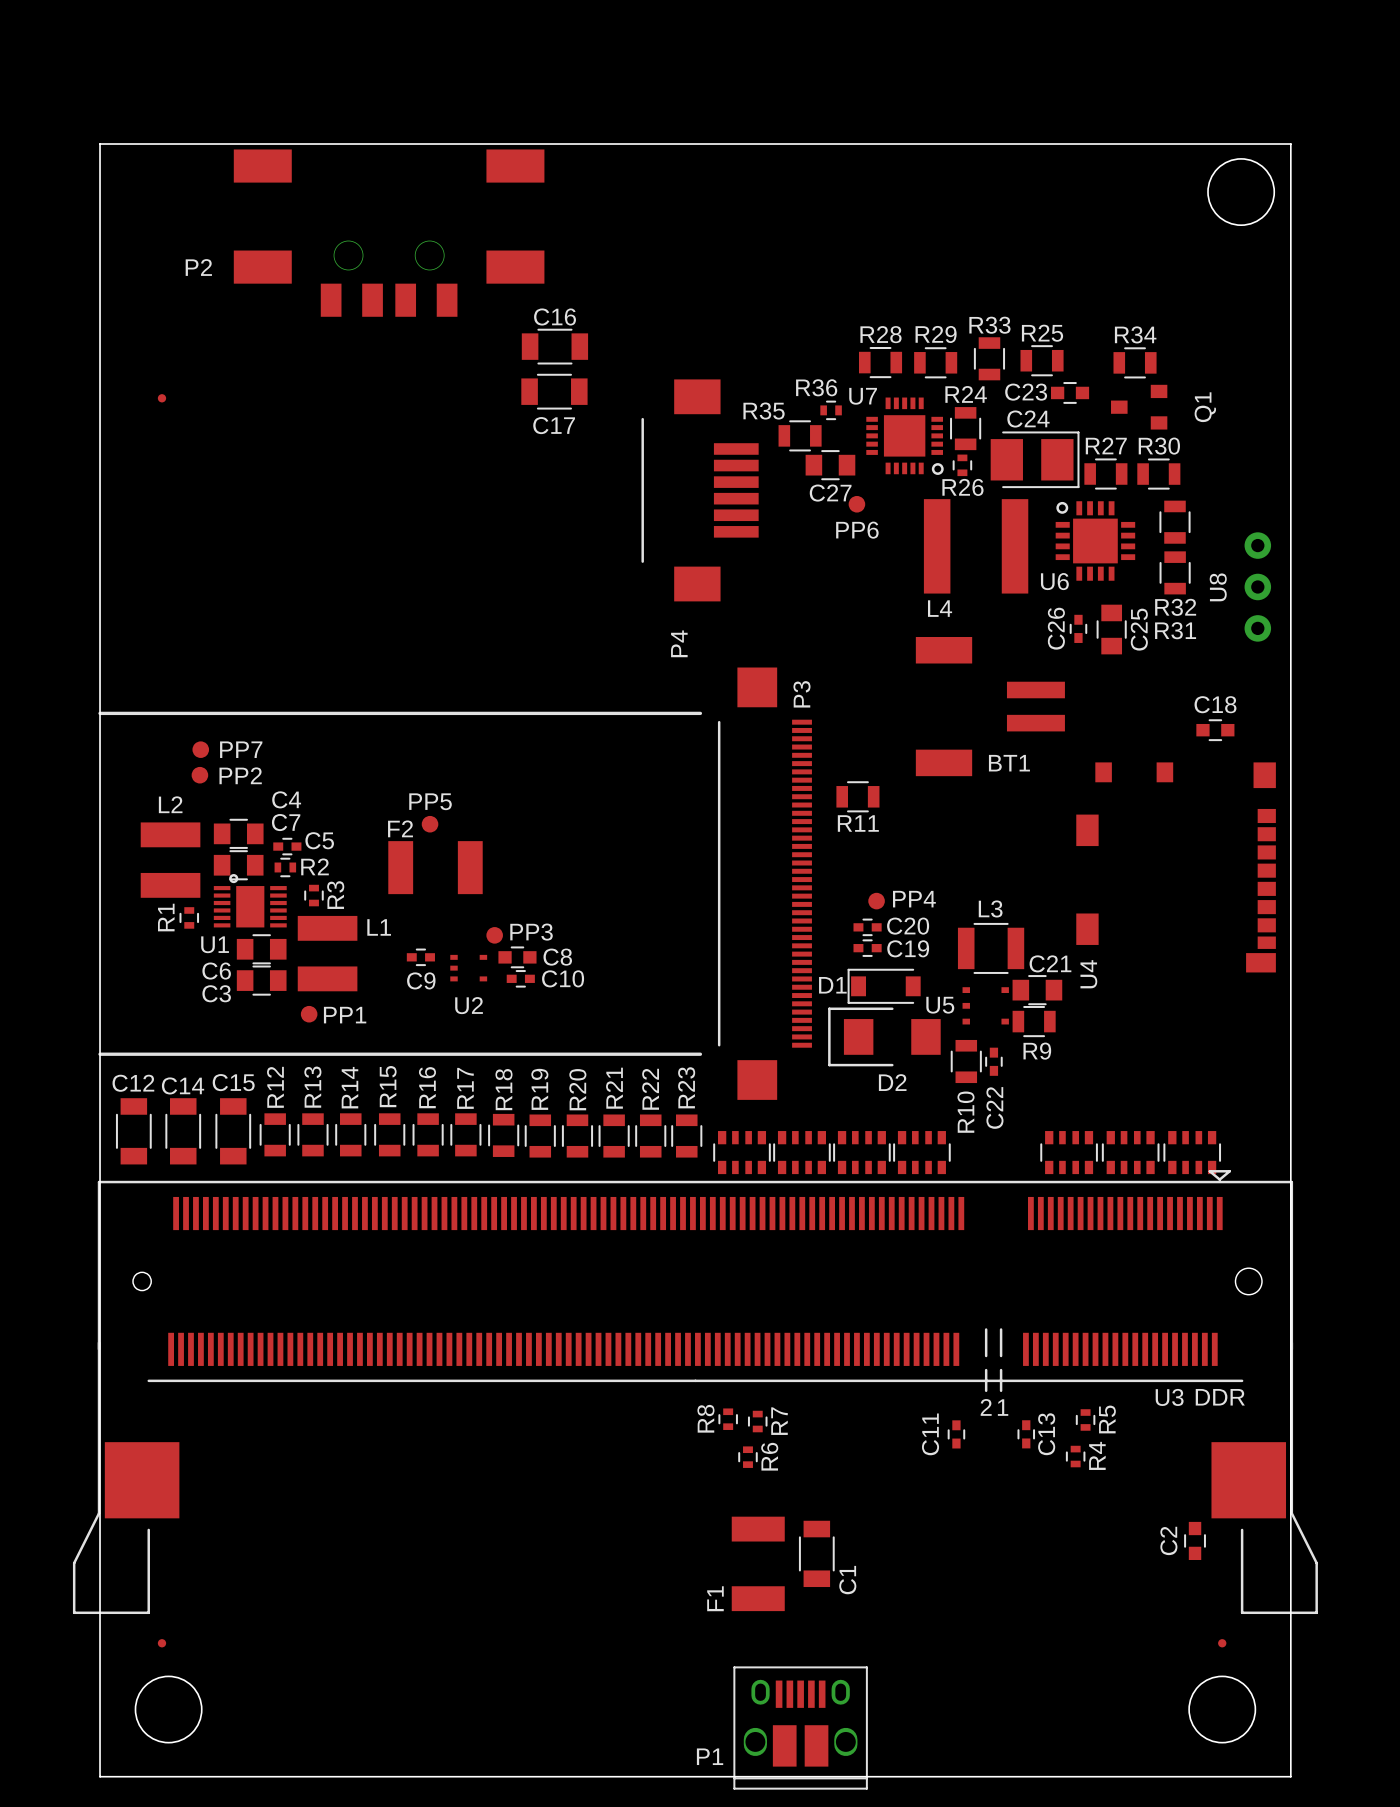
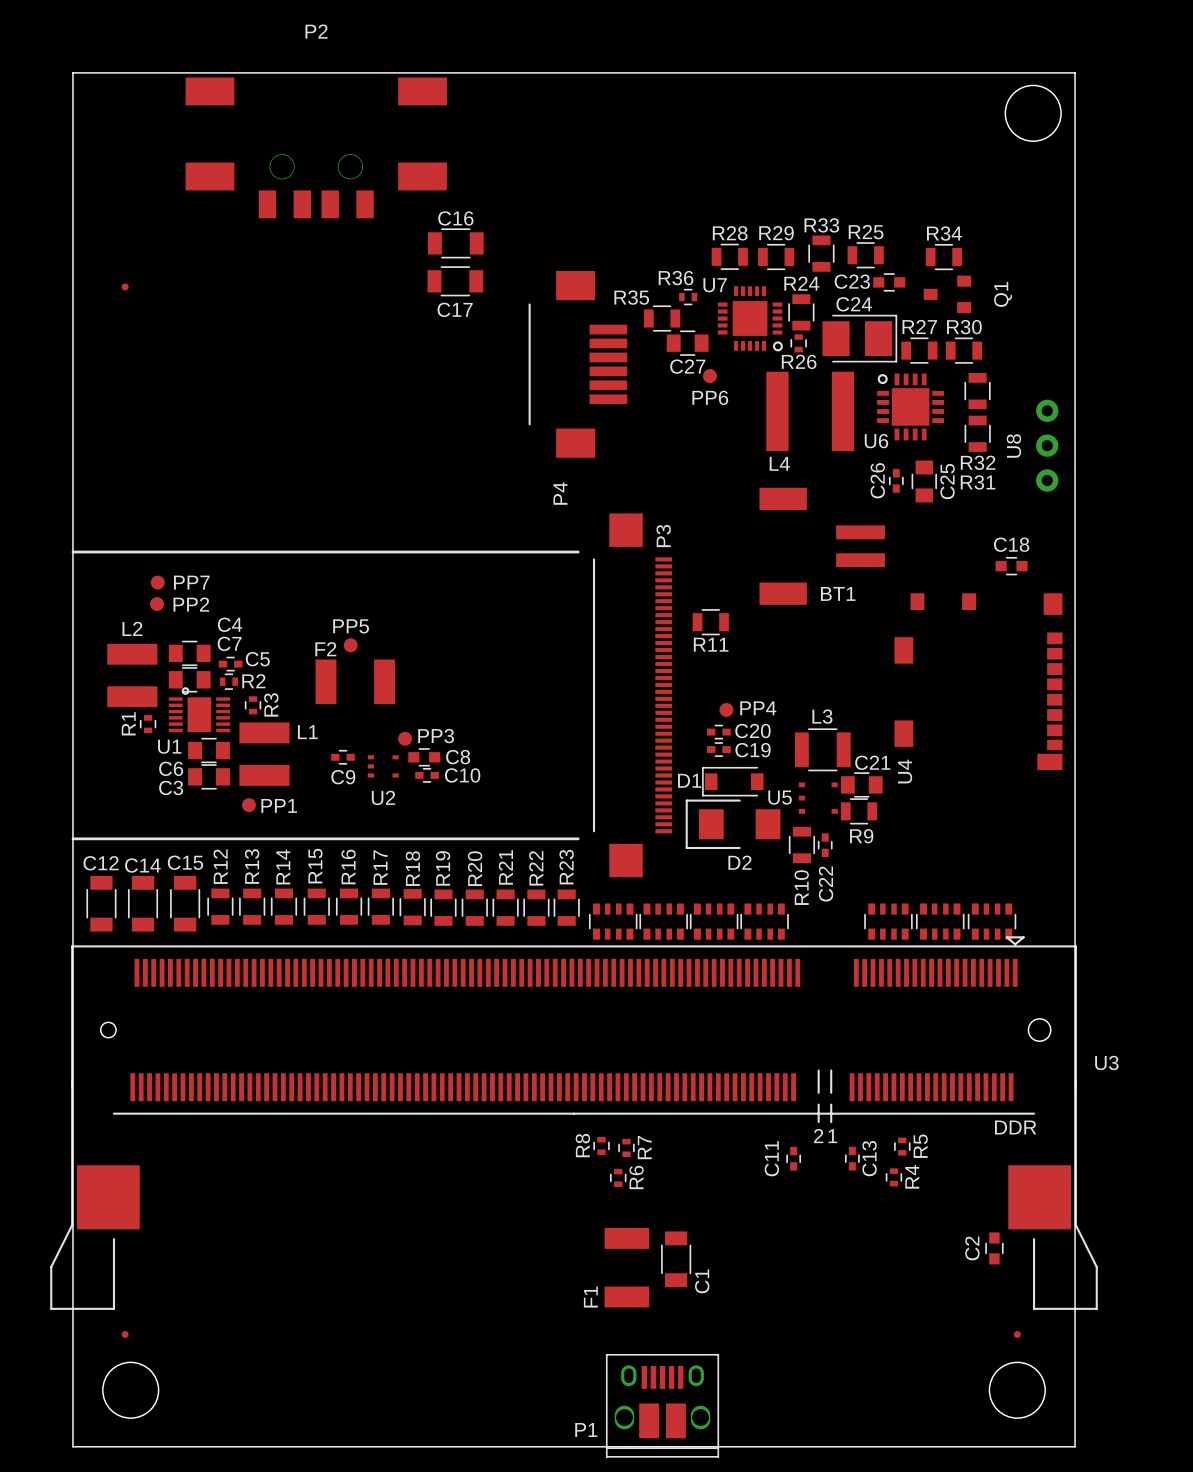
P2 name position: P2 (198, 267) -> P2 (316, 31)
U3 name position: U3 (1169, 1397) -> U3 (1106, 1062)

